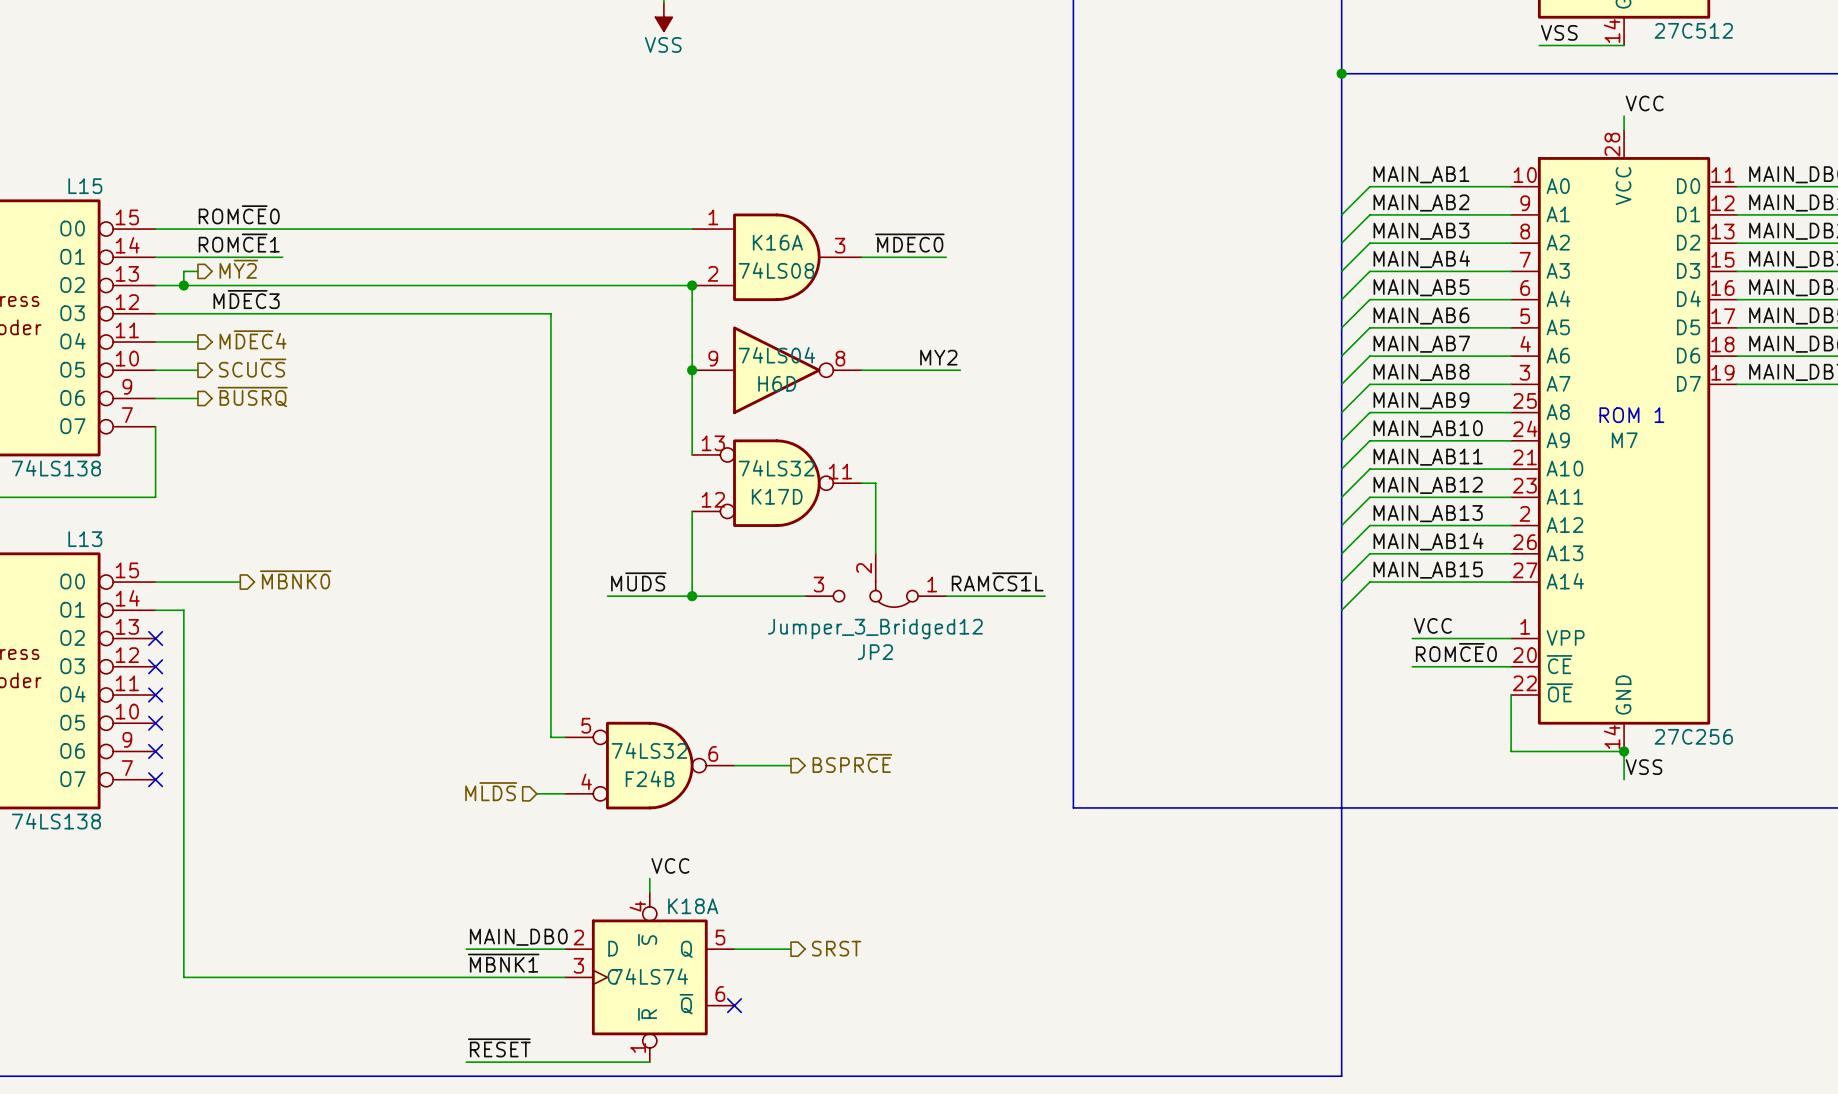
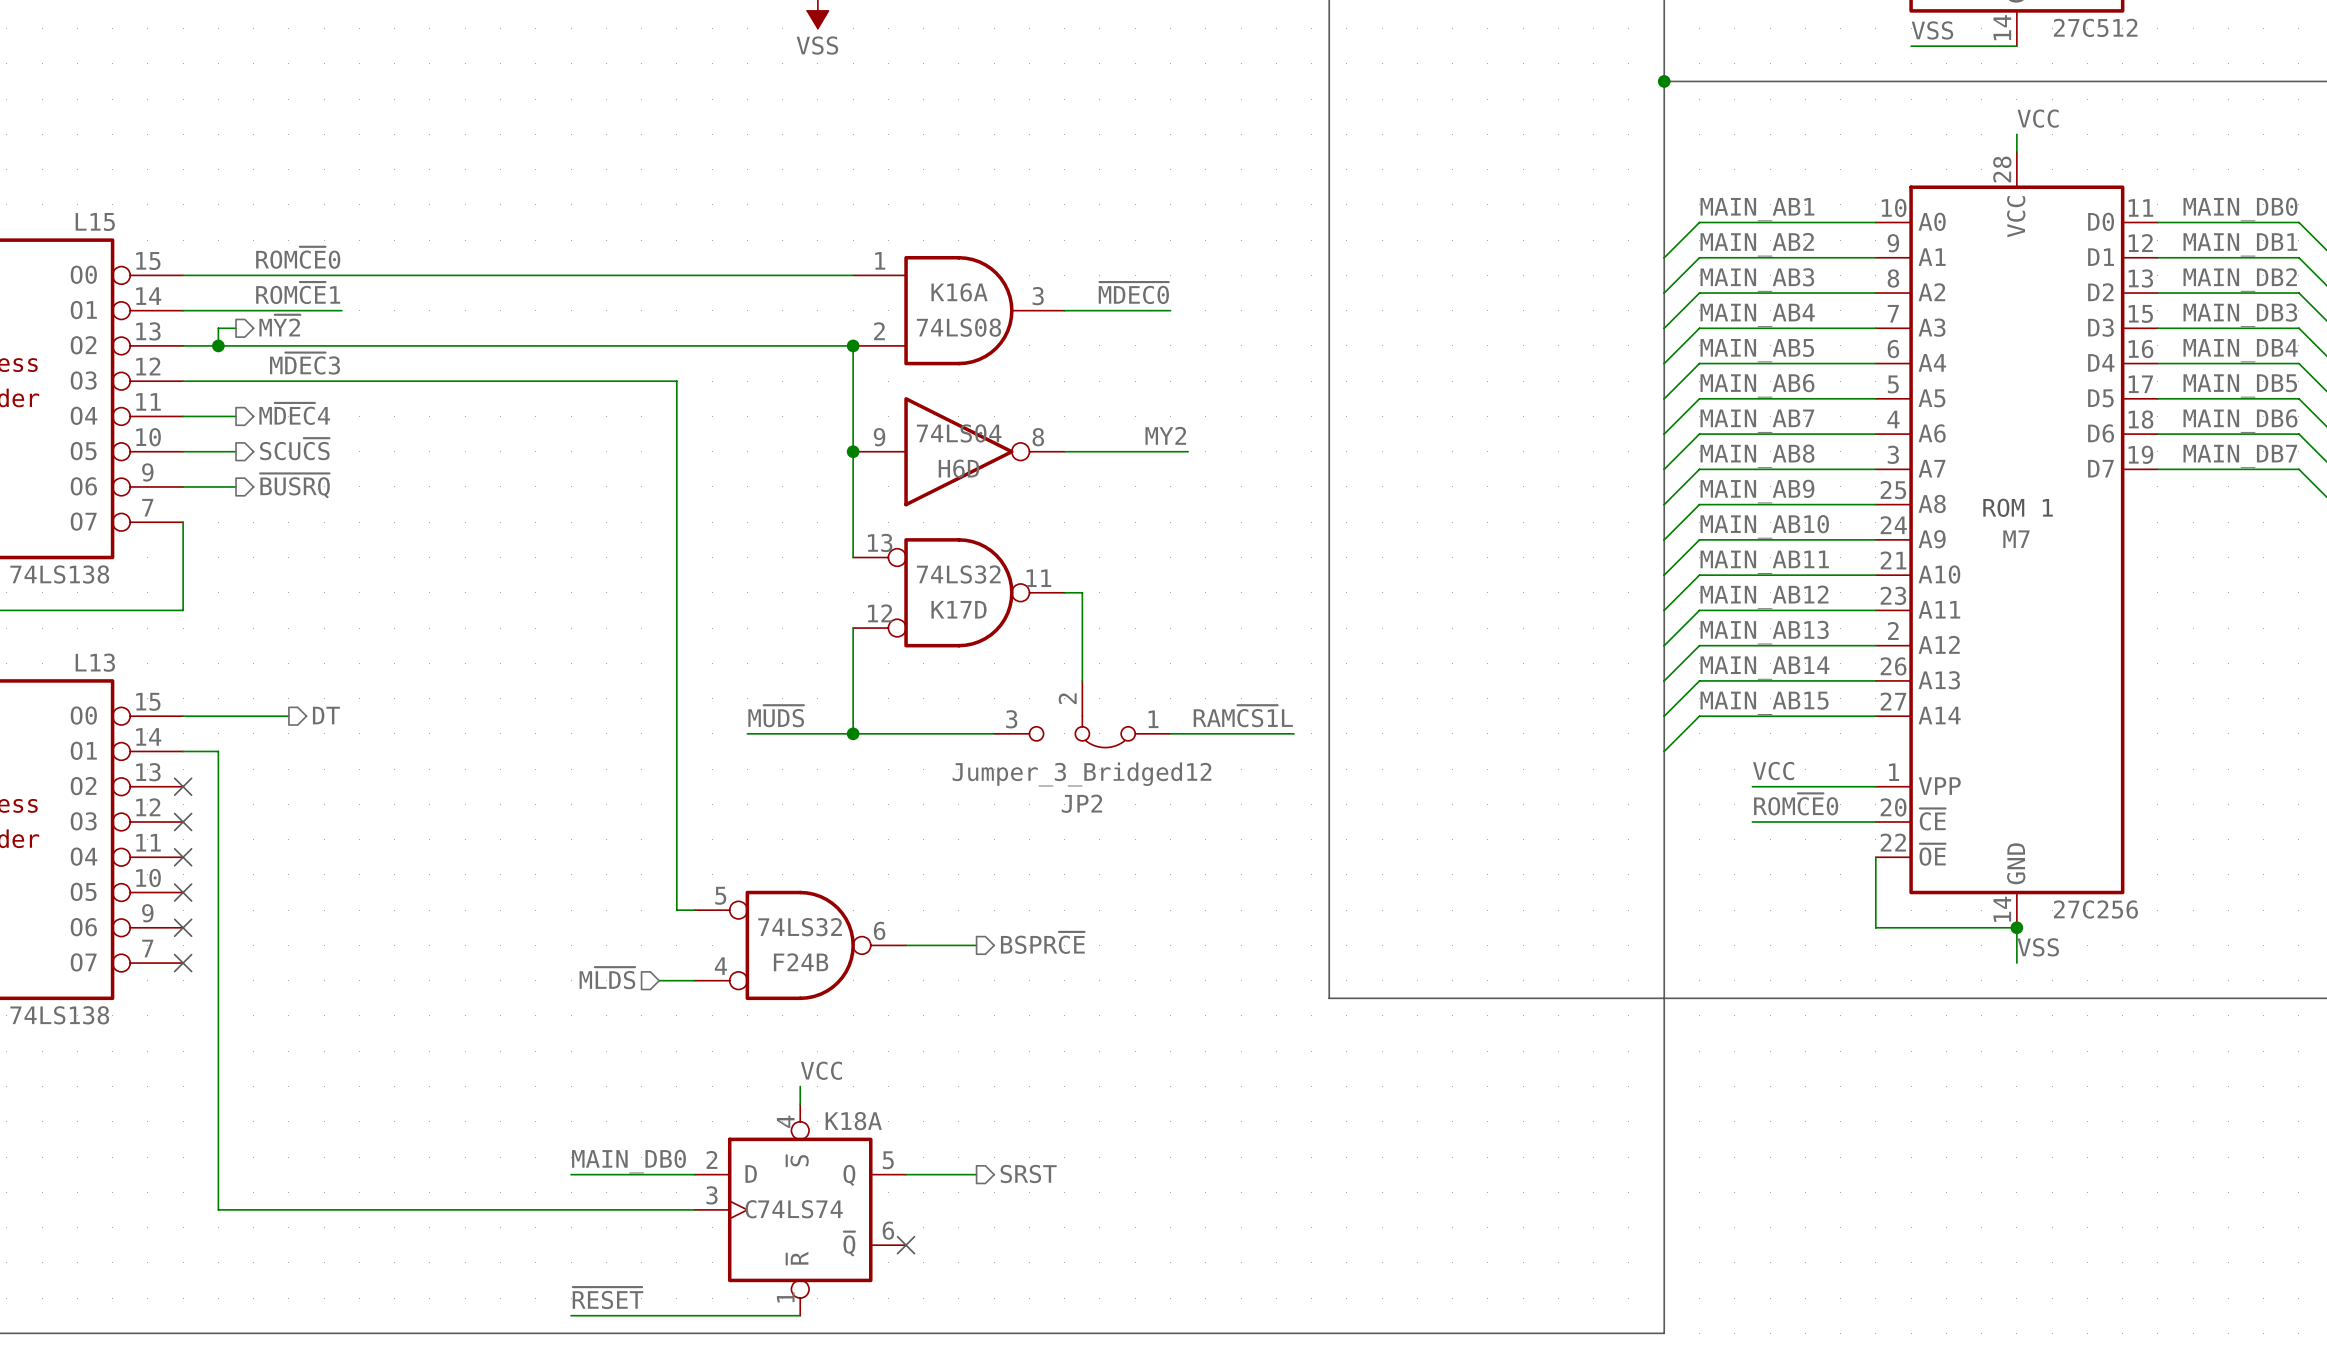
hierarchical label: ~{MBNK0} (295, 579) -> DT (326, 715)
label: ~{MBNK1} (503, 963) -> none

